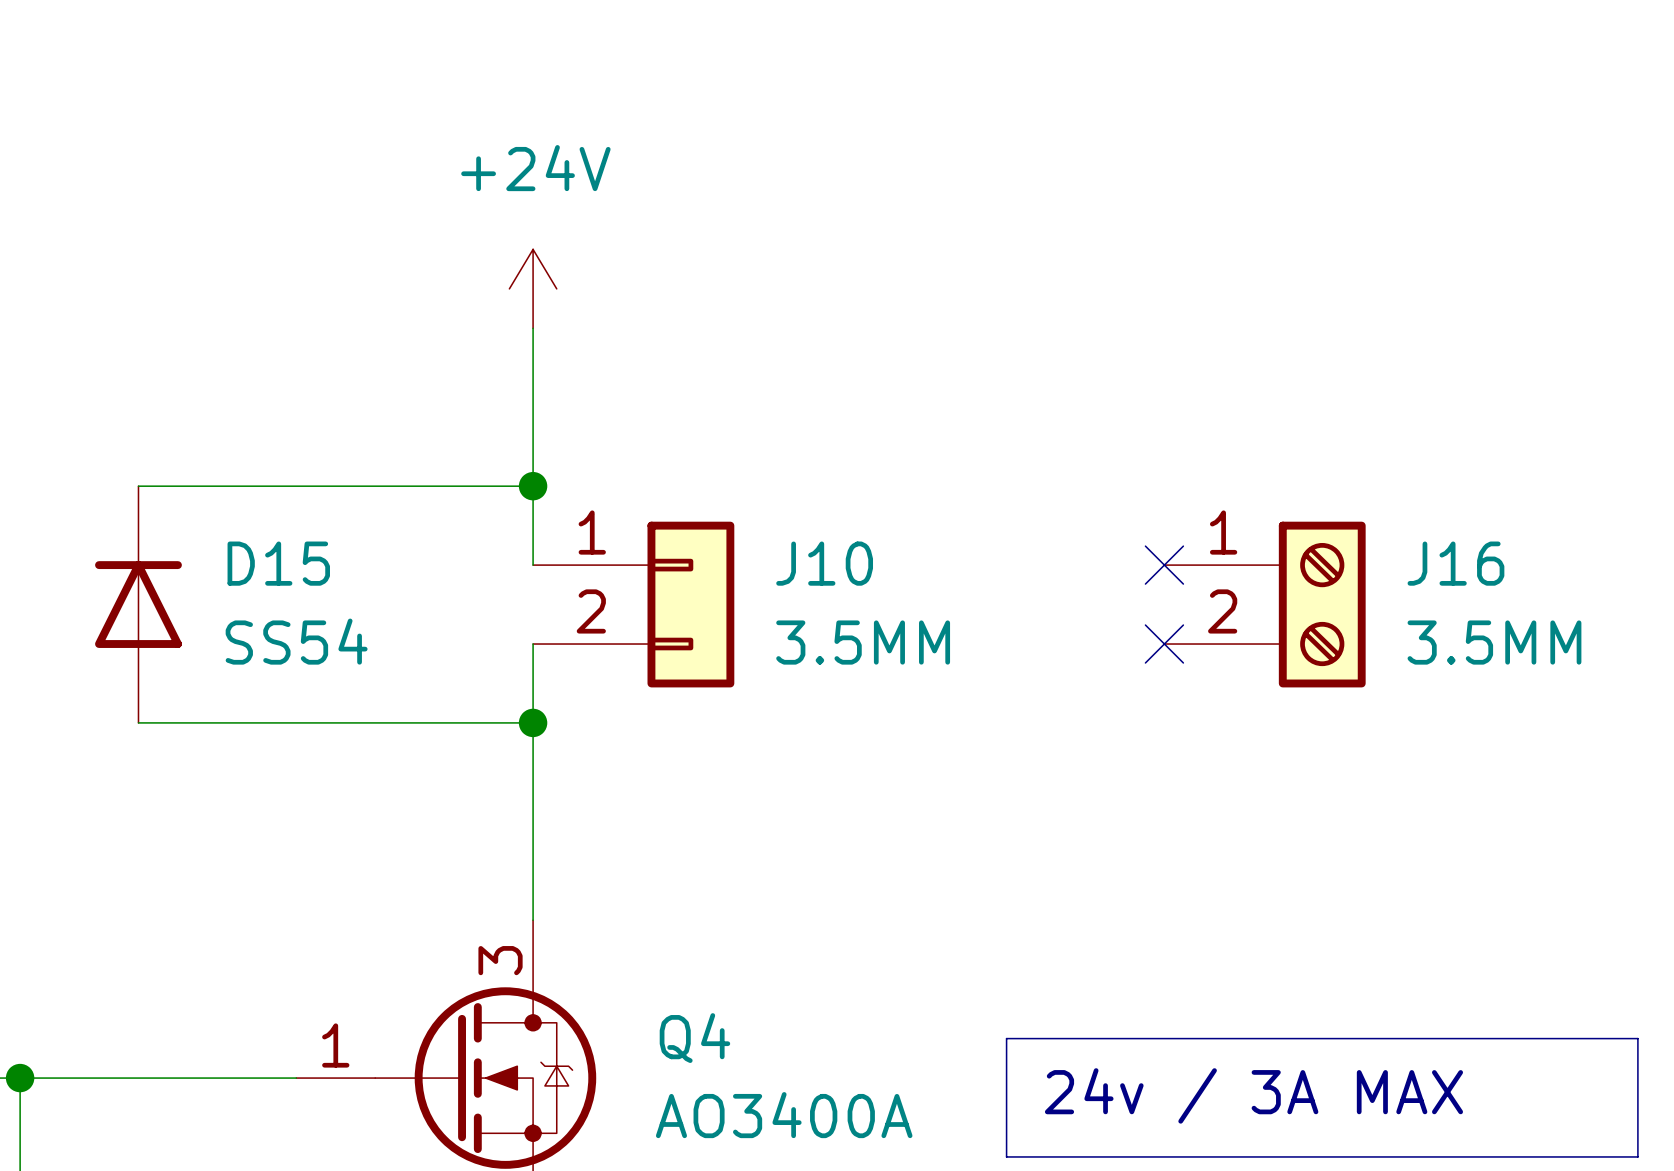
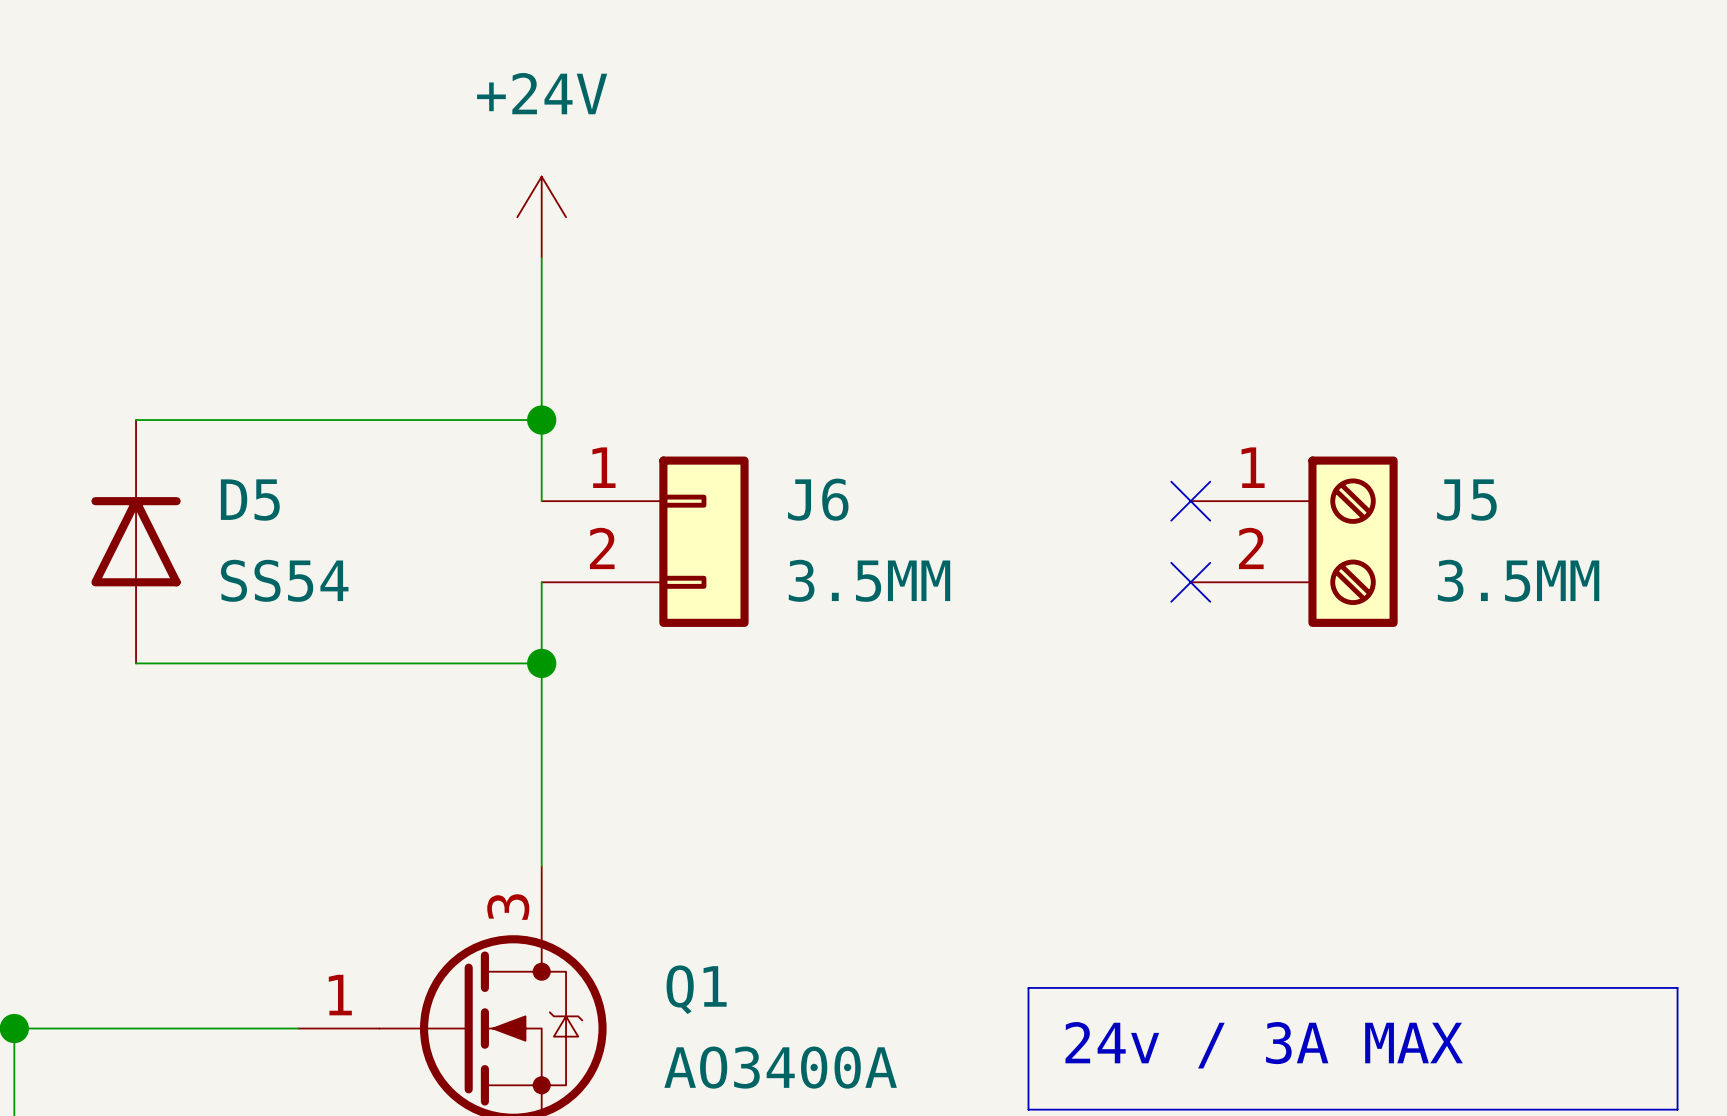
D15 name: D15 (278, 563) -> D5 (250, 500)
J10 name: J10 (824, 563) -> J6 (818, 499)
J16 name: J16 (1455, 563) -> J5 (1466, 500)
Q4 name: Q4 (694, 1038) -> Q1 (696, 989)

